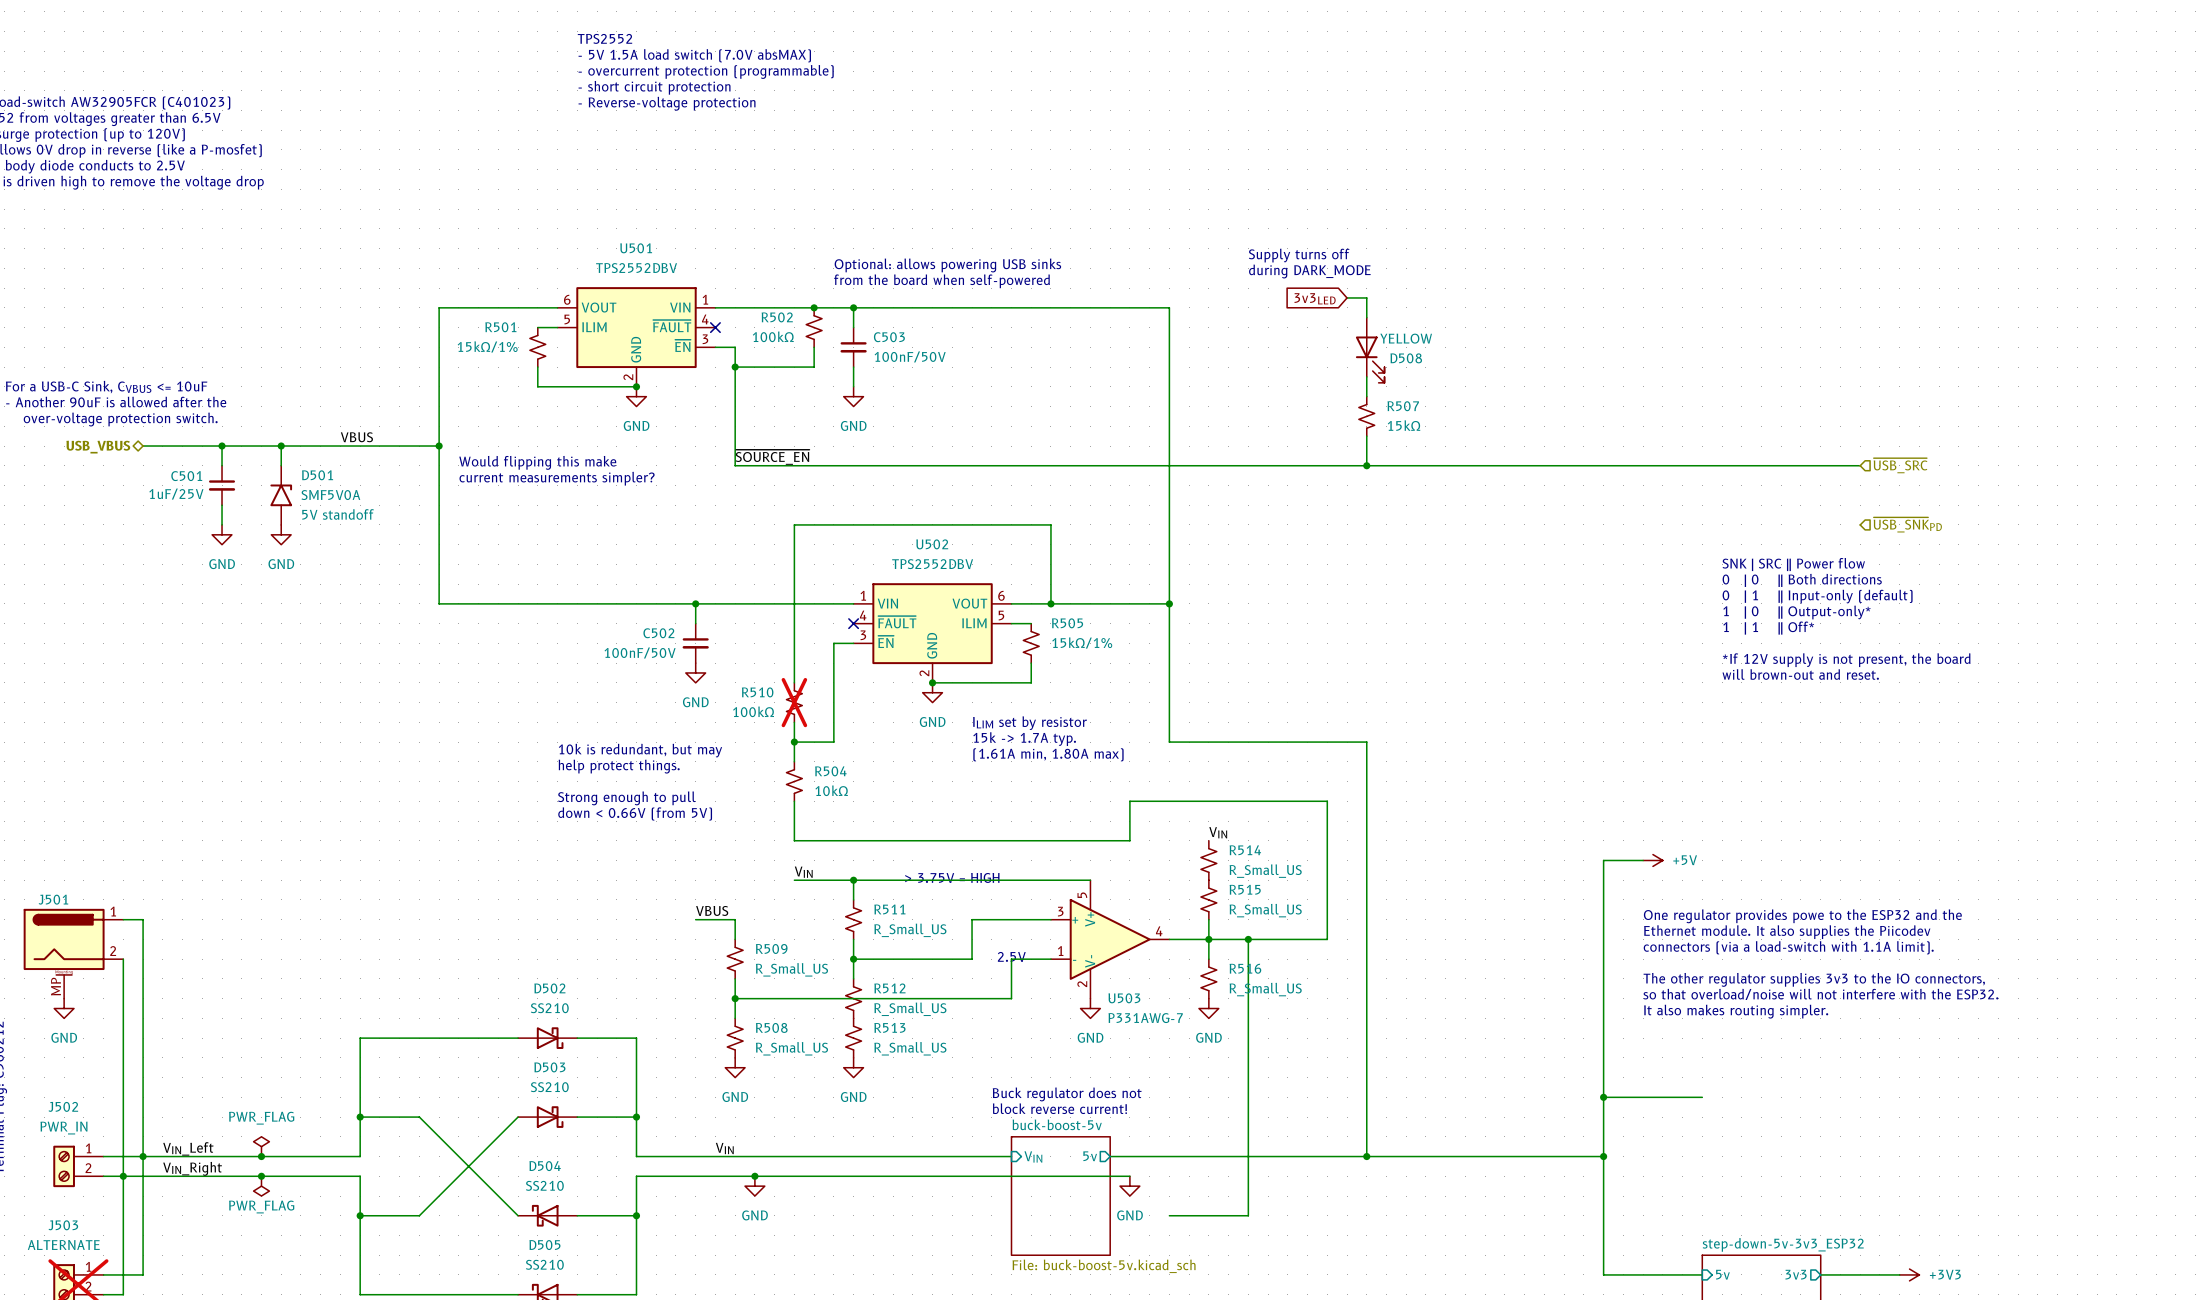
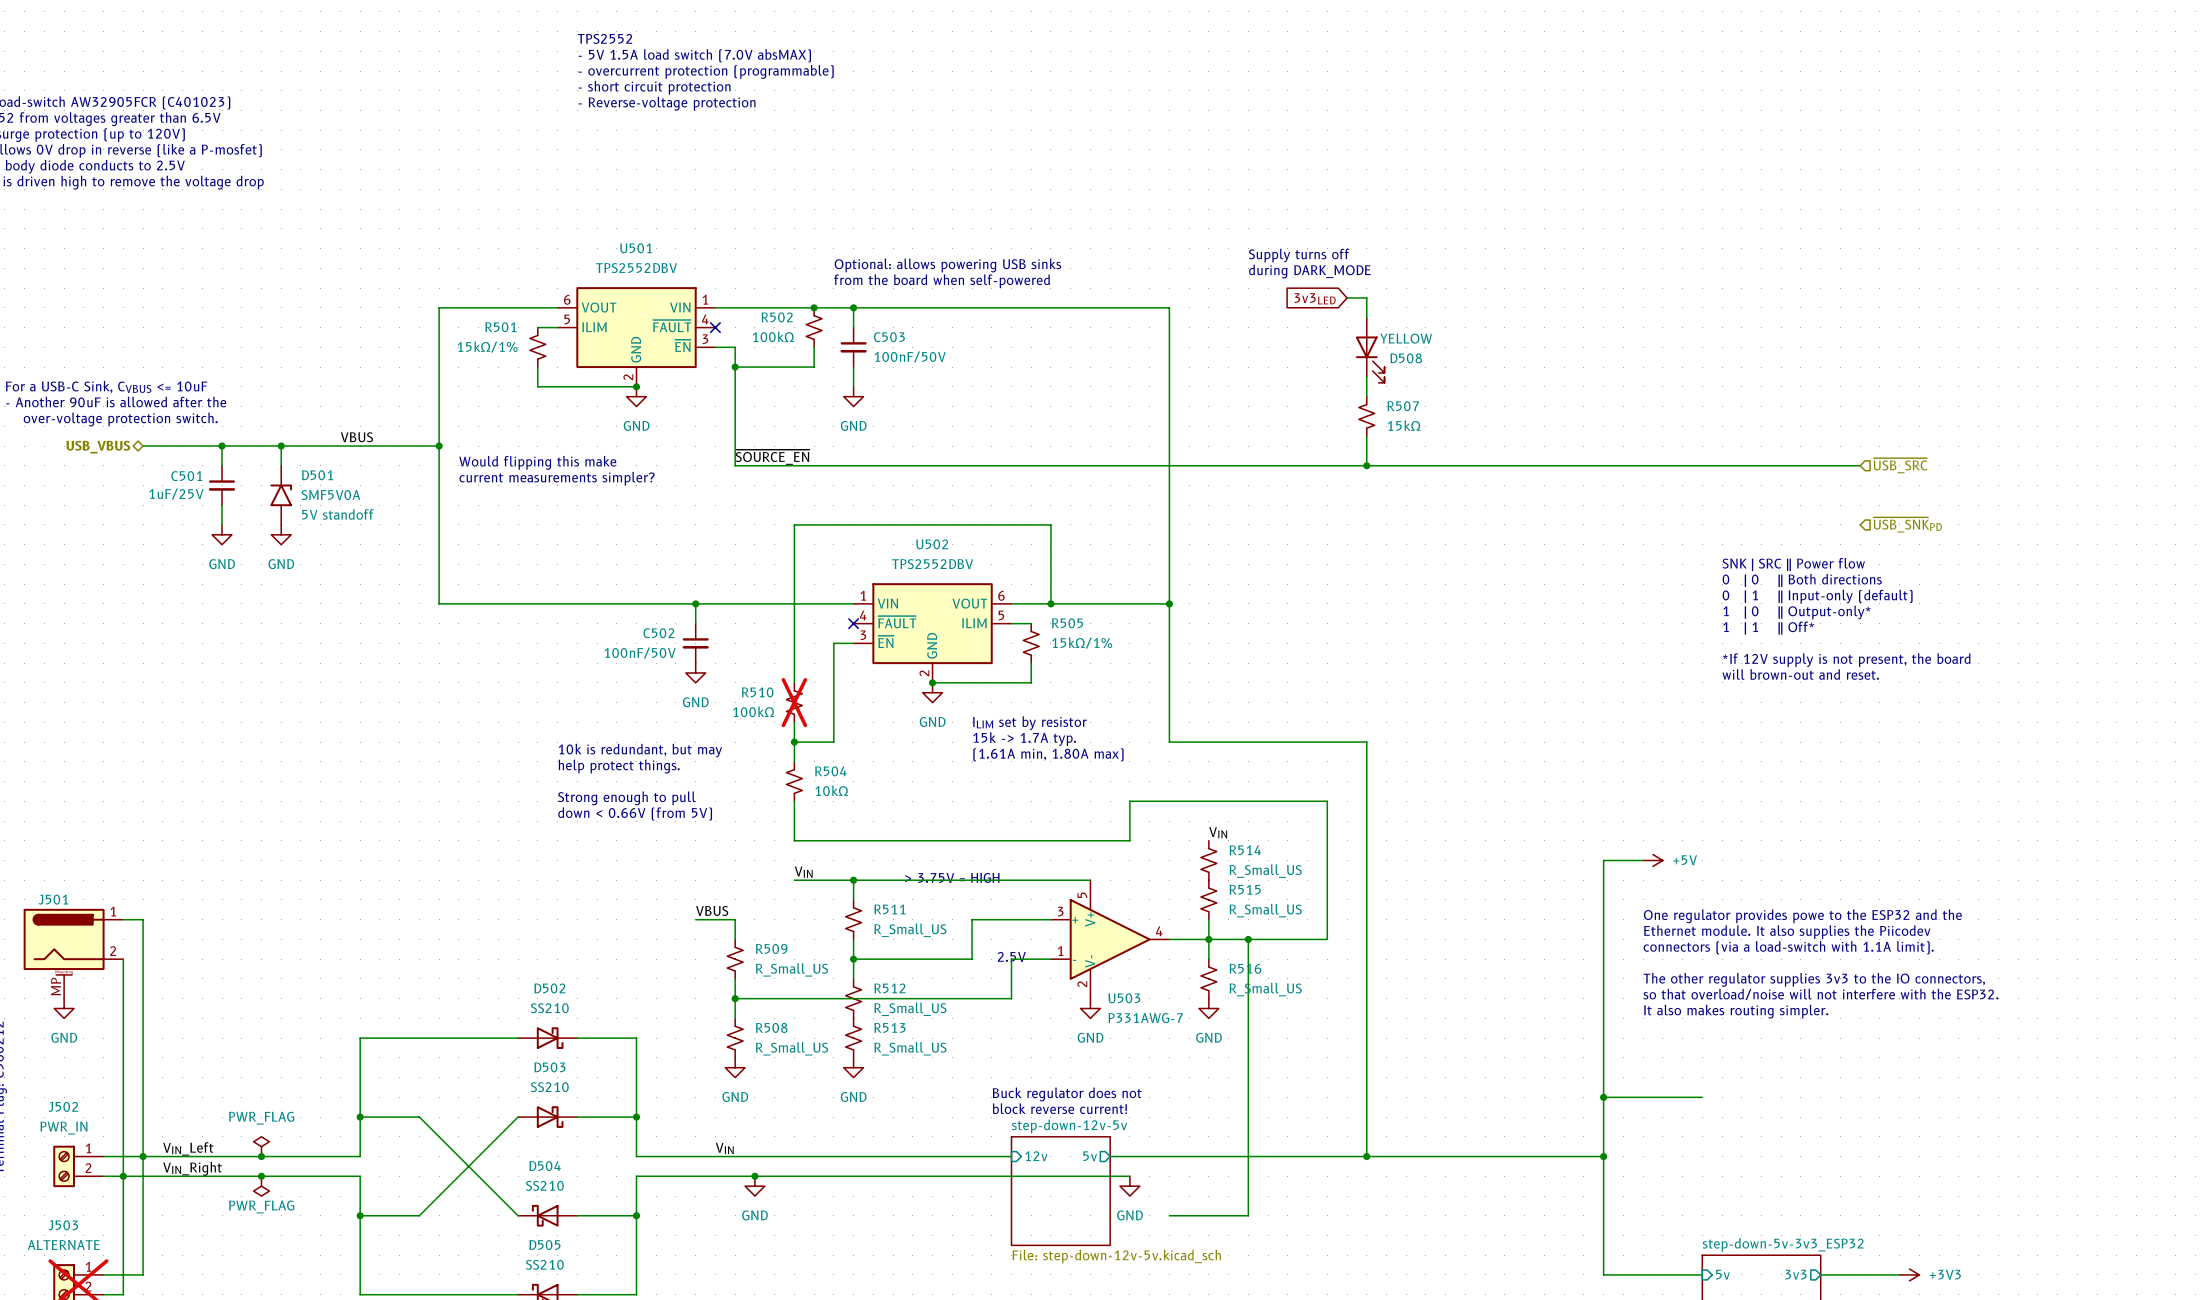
sheet pin: VIN (1033, 1156) -> 12v (1036, 1156)
sheet step-down-12v-5v: none -> File: step-down-12v-5v.kicad_sch (1060, 1191)
sheet buck-boost-5v: File: buck-boost-5v.kicad_sch (1060, 1196) -> none

